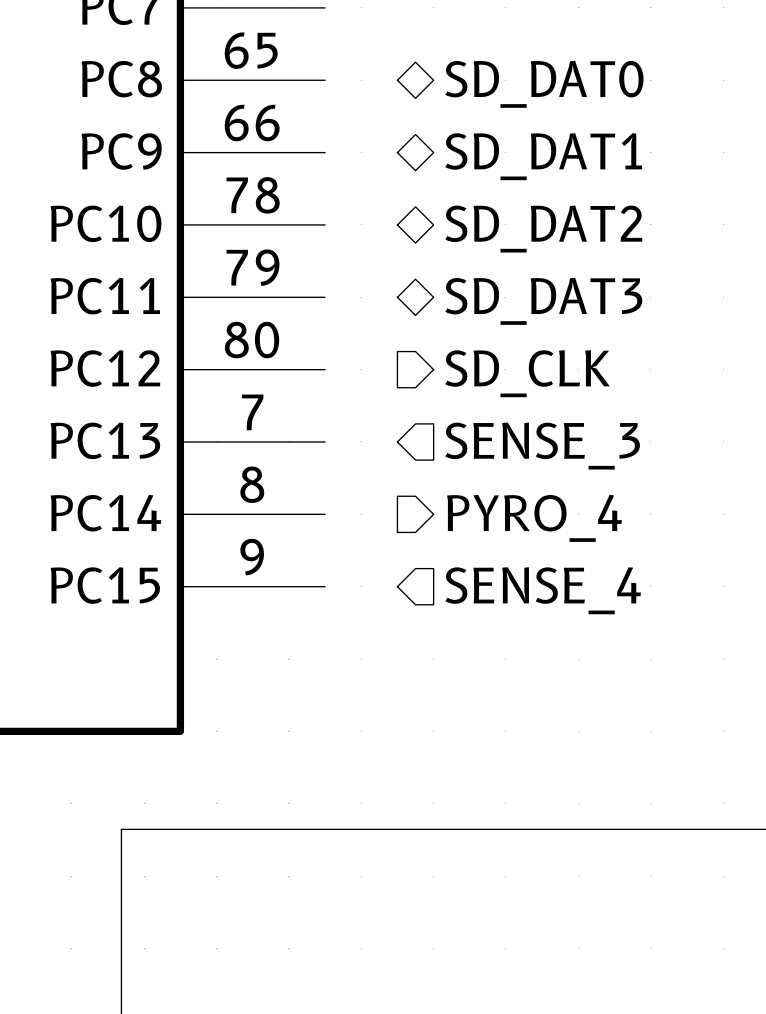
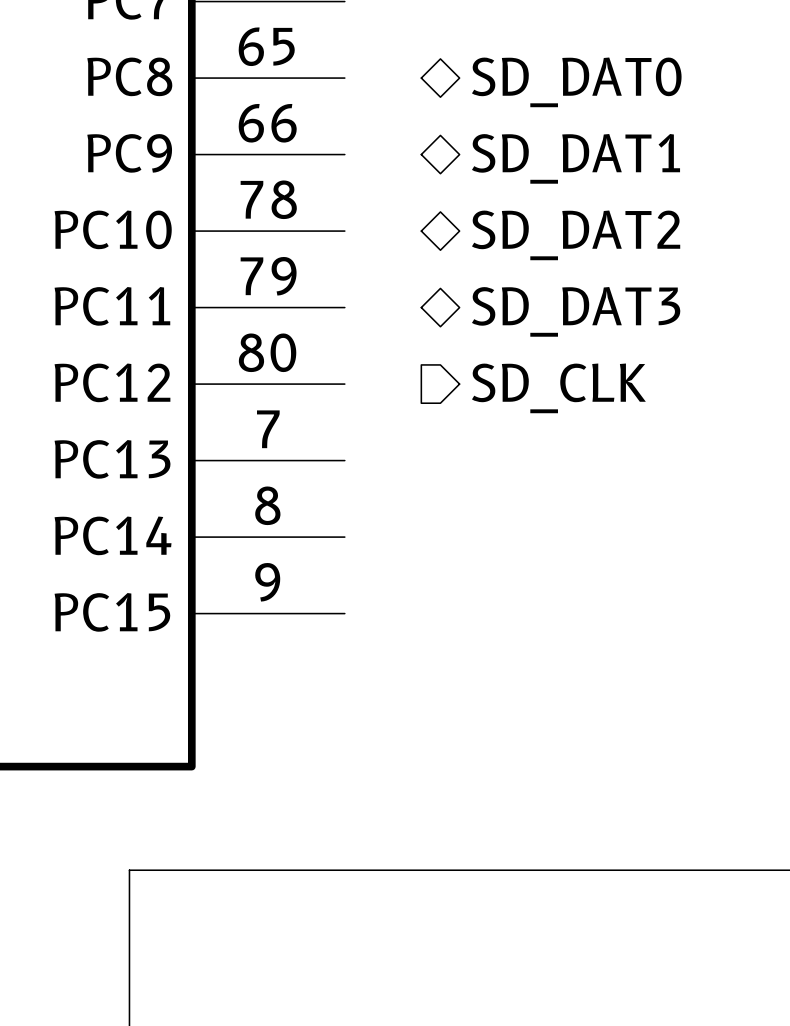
hierarchical label: SENSE_3 (542, 446) -> none
hierarchical label: PYRO_4 (534, 518) -> none
hierarchical label: SENSE_4 (543, 590) -> none

